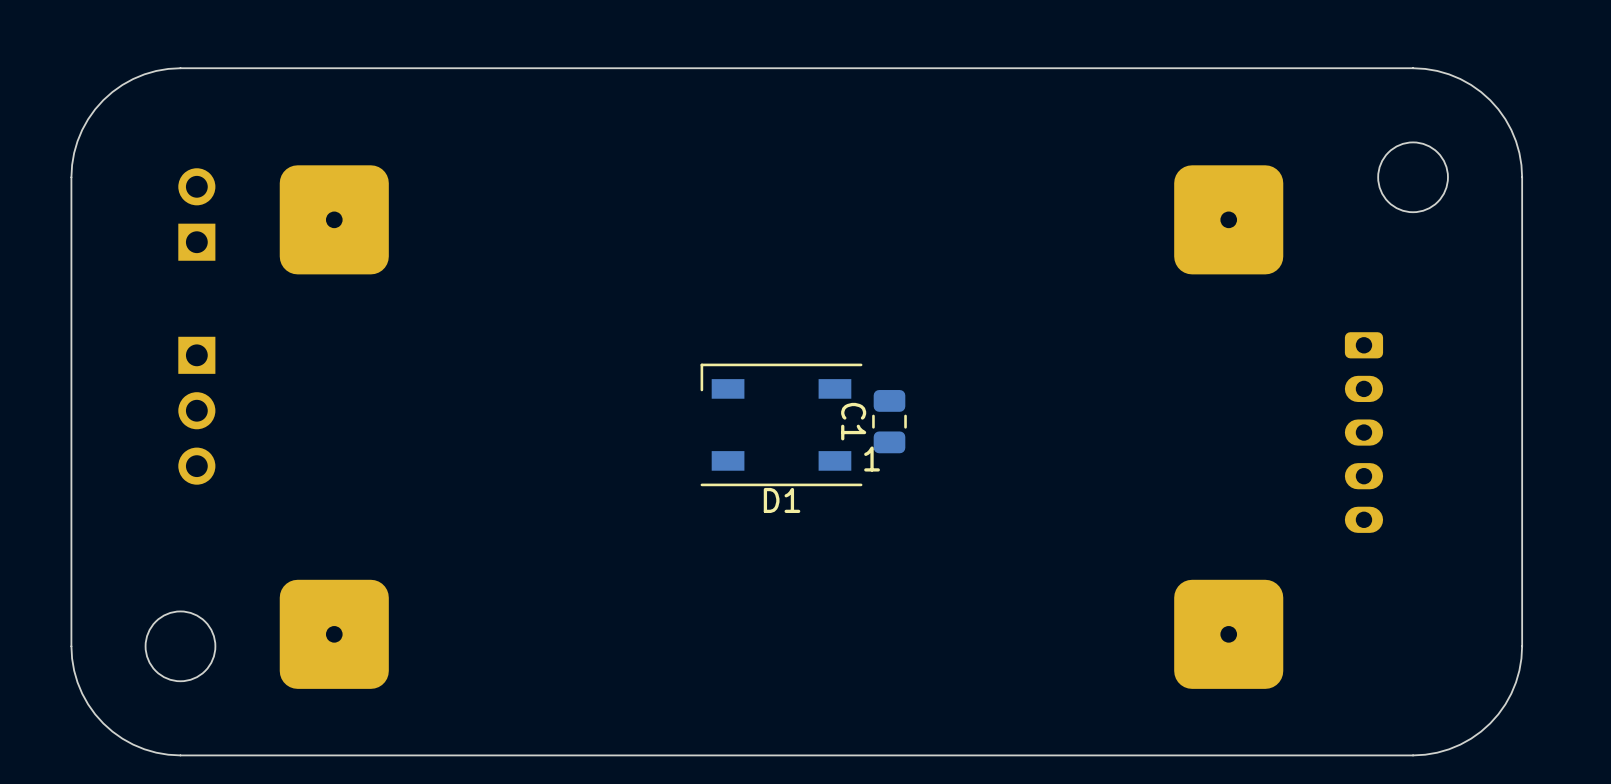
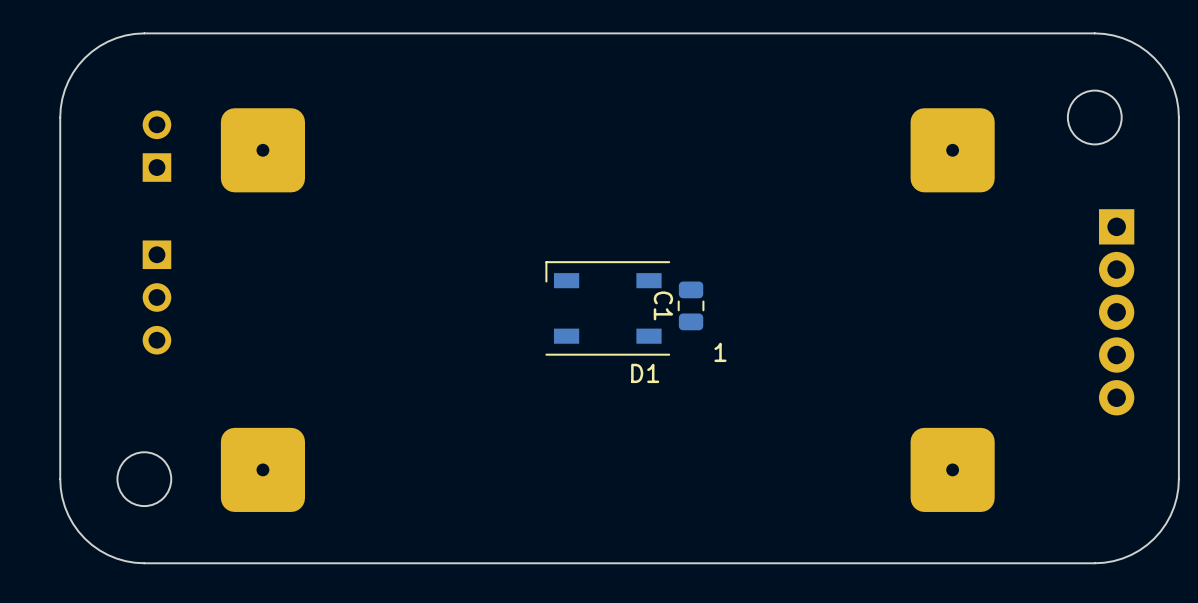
part: none -> (1116, 312)
part: (1363, 432) -> none
D1 text position: 1 (872, 459) -> 1 (720, 352)
D1 name position: D1 (782, 500) -> D1 (645, 373)

